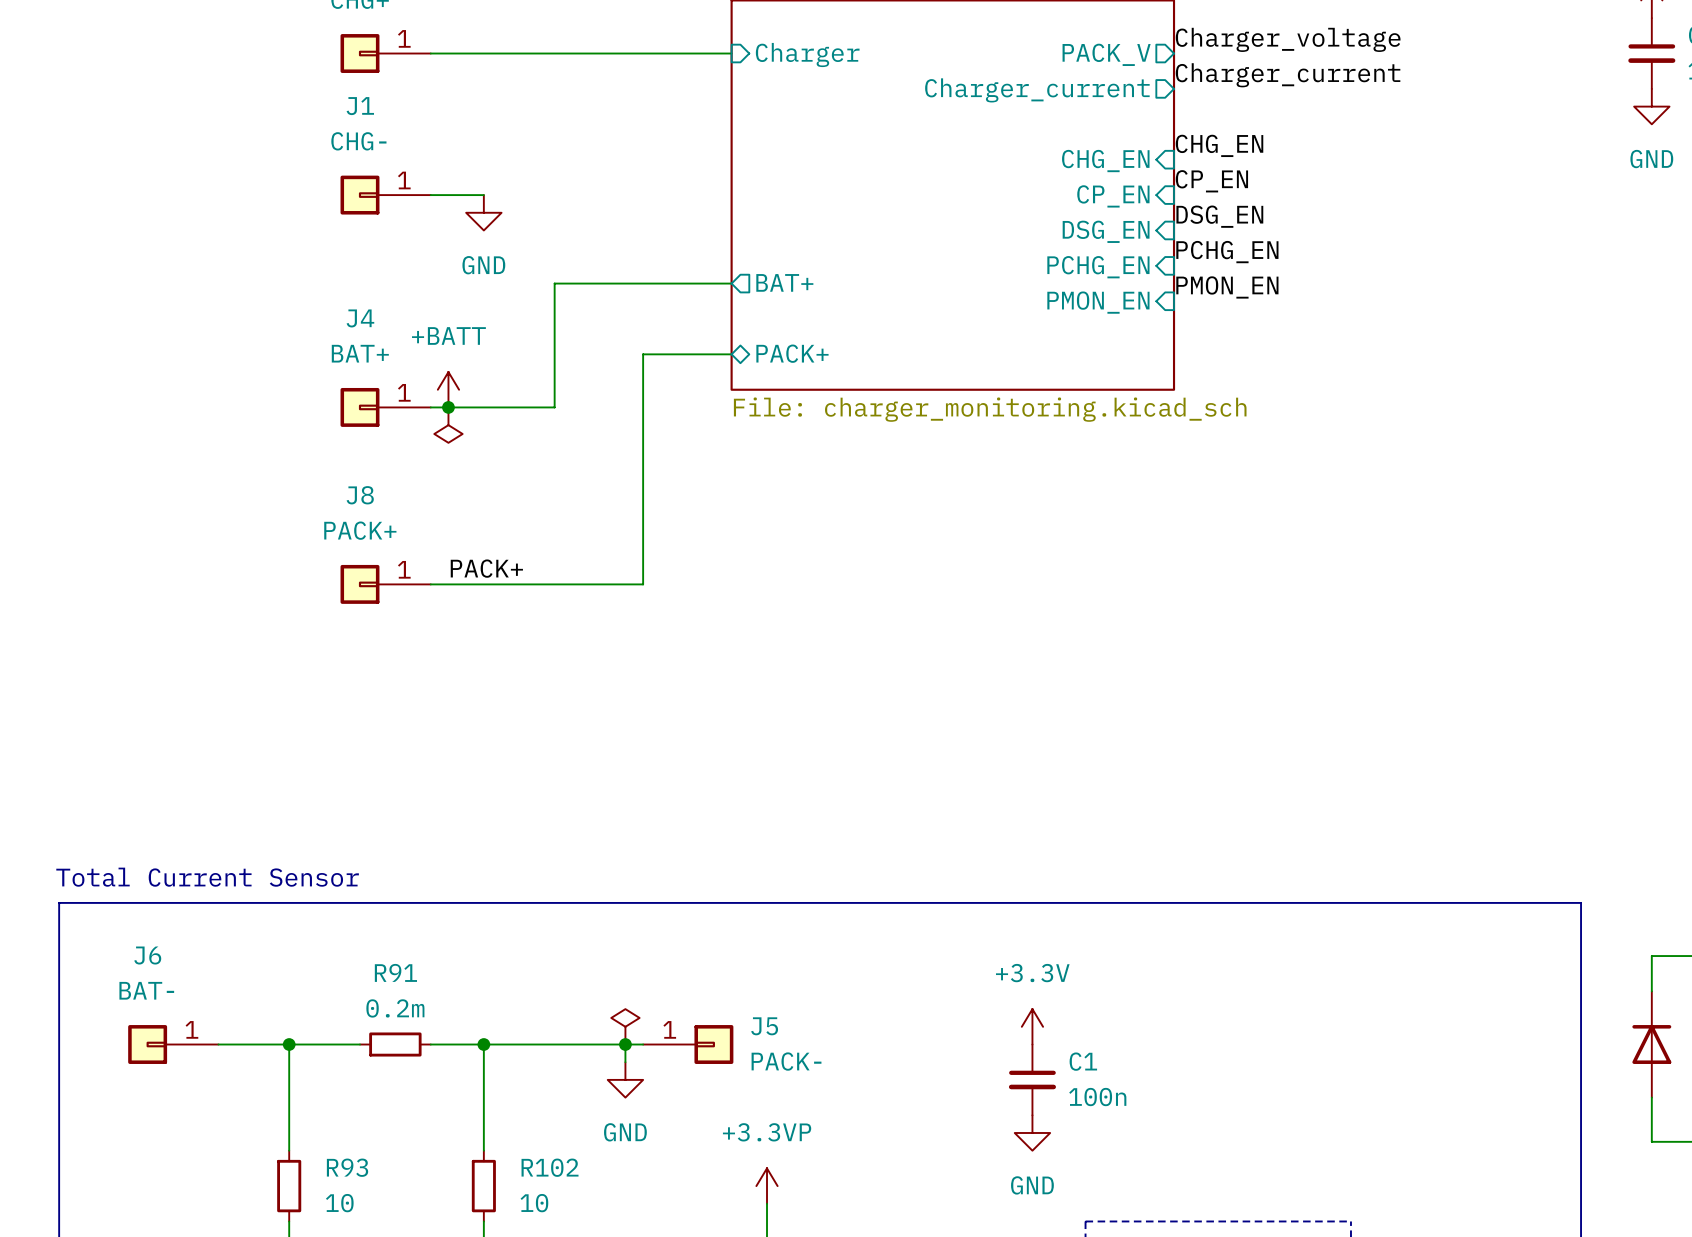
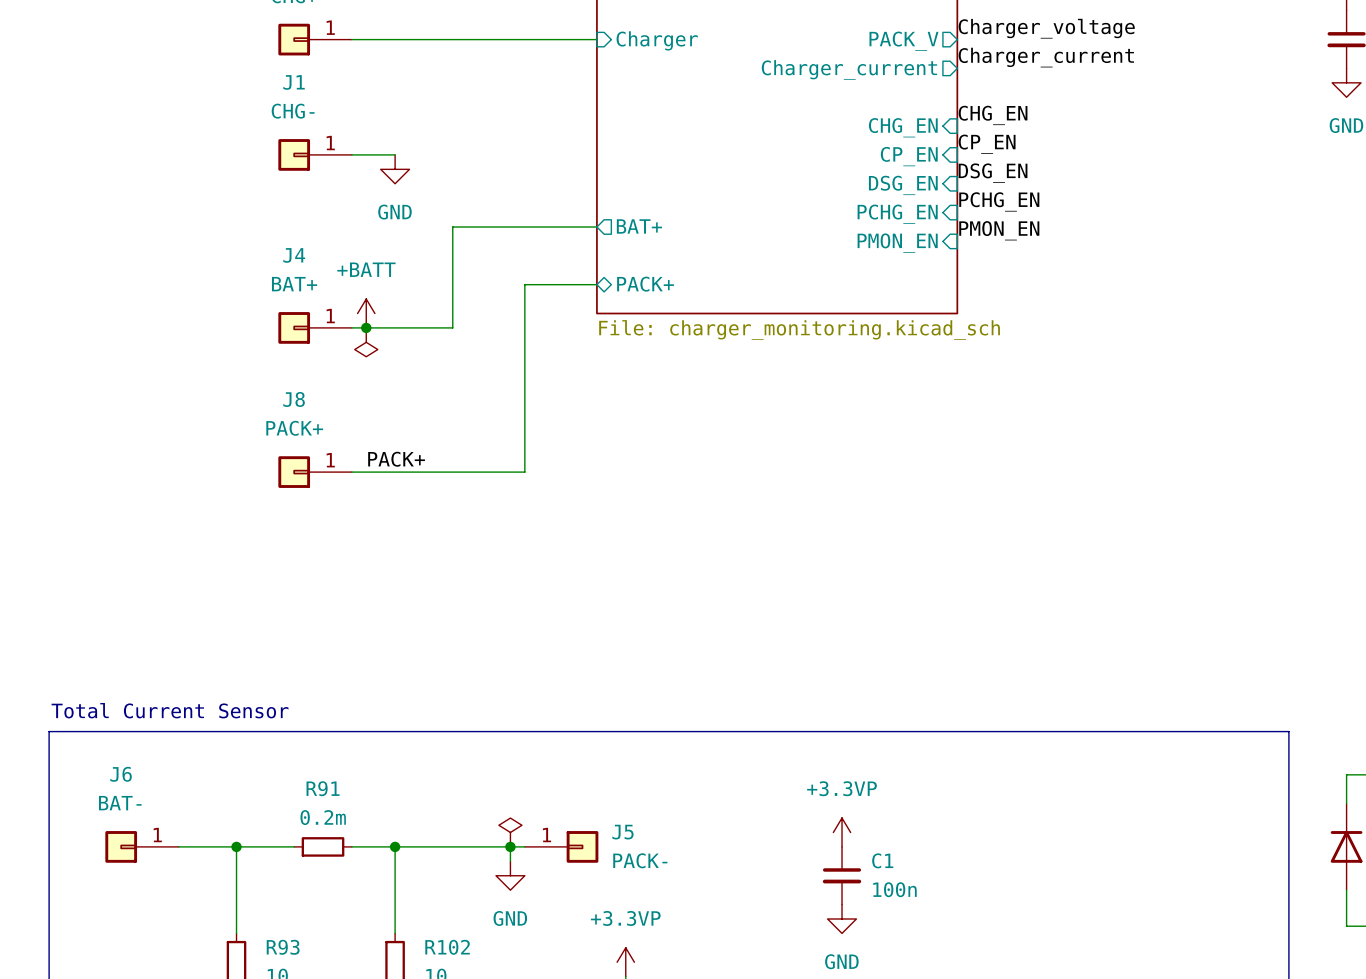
power symbol: +3.3V (1032, 1026) -> +3.3VP (842, 832)

